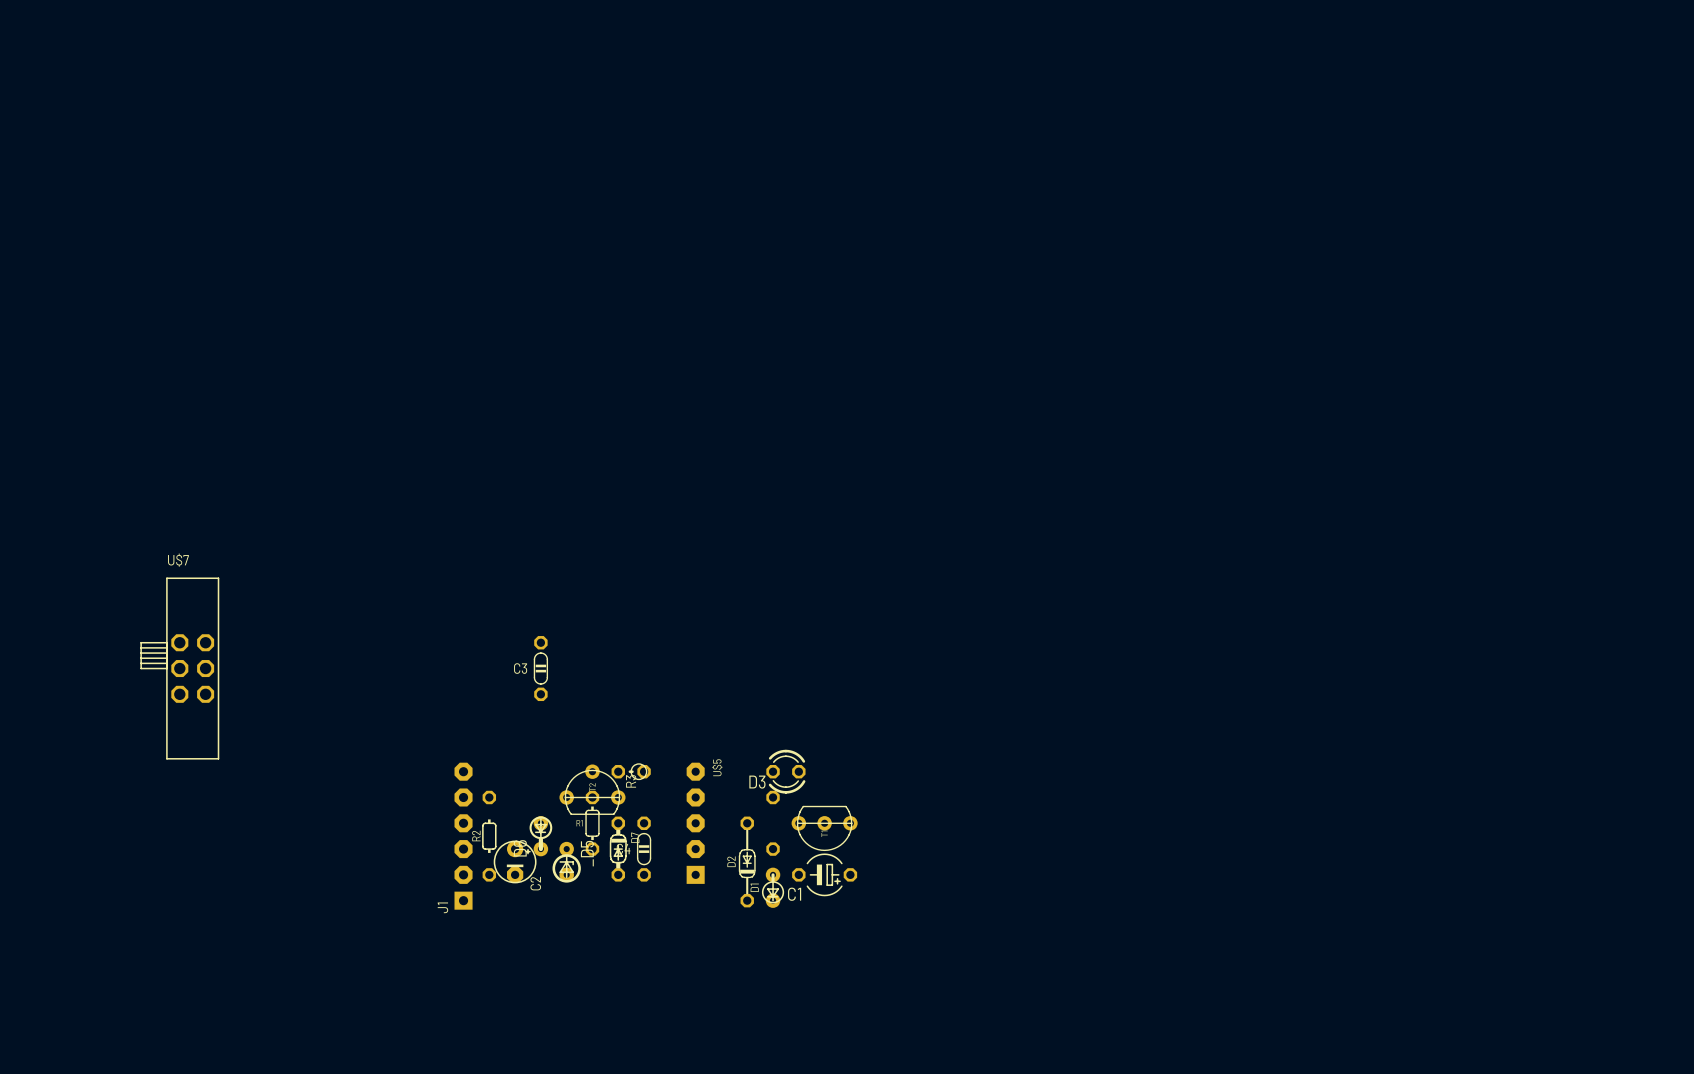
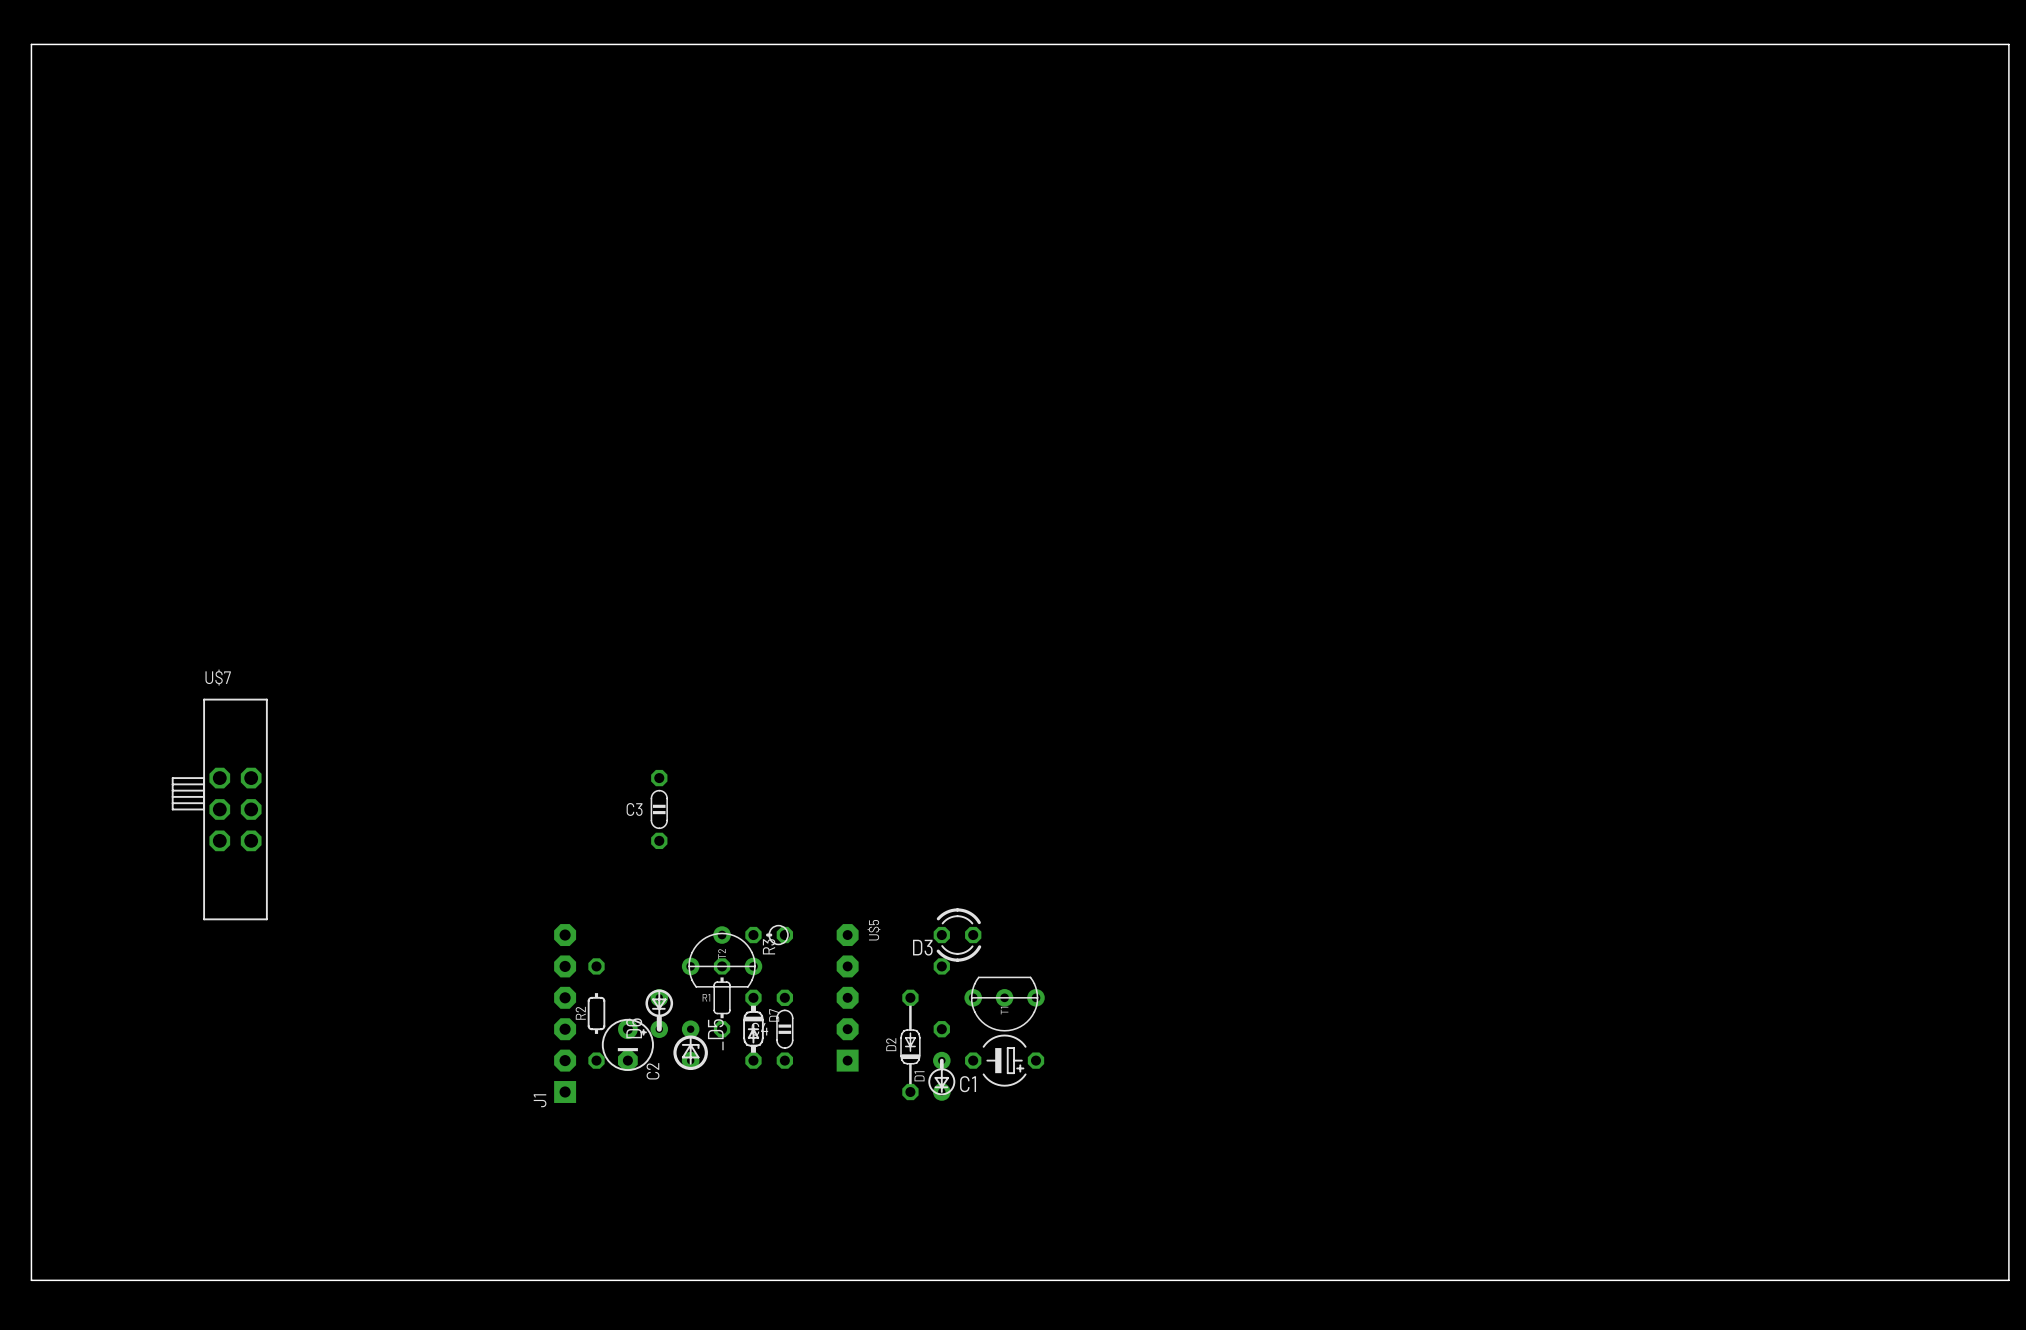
board edge: none -> (31, 44) (2008, 44) (2008, 1280) (31, 1280) (31, 44)

